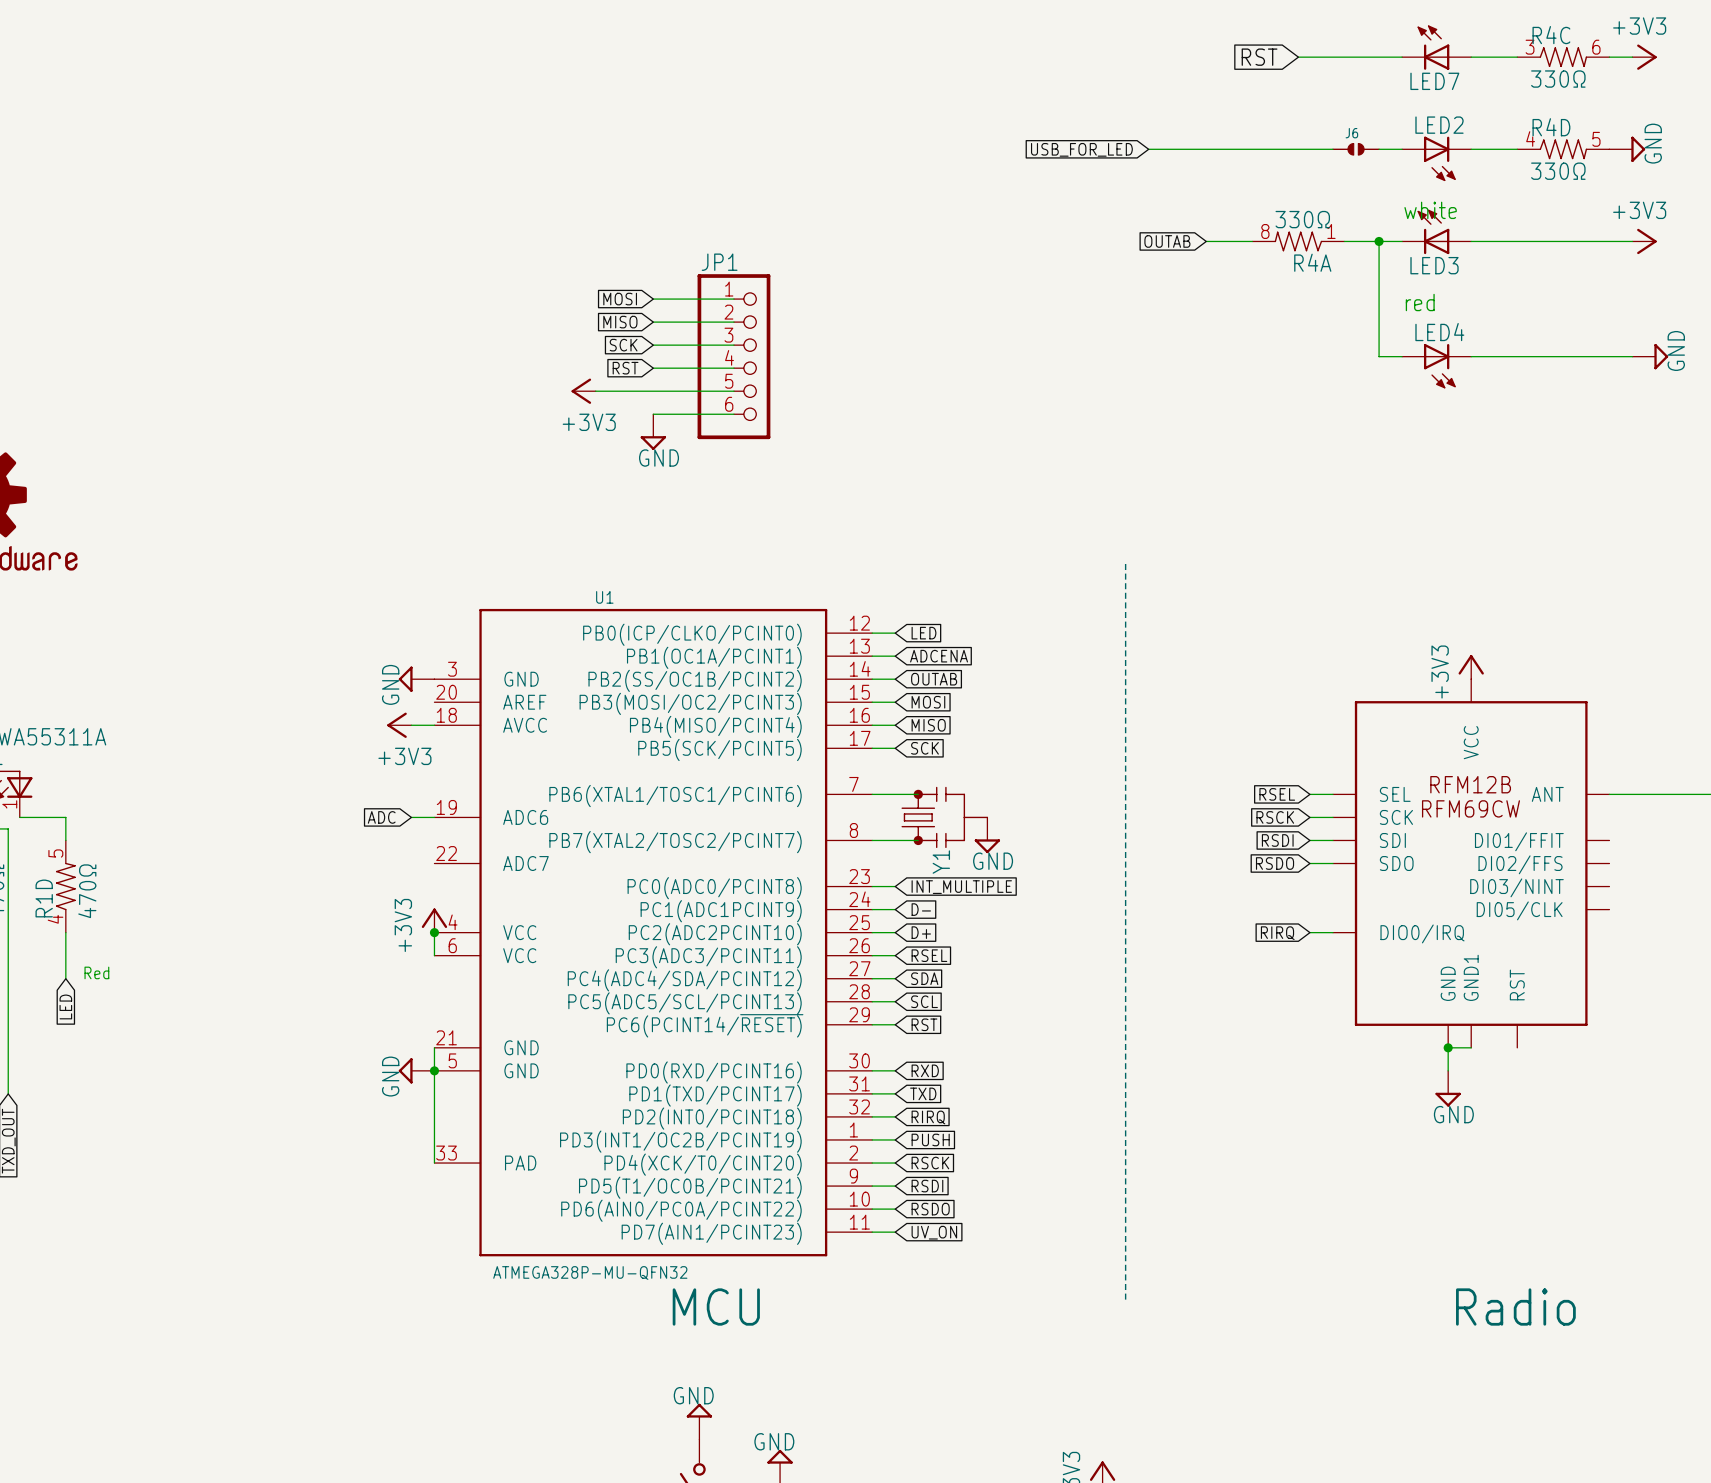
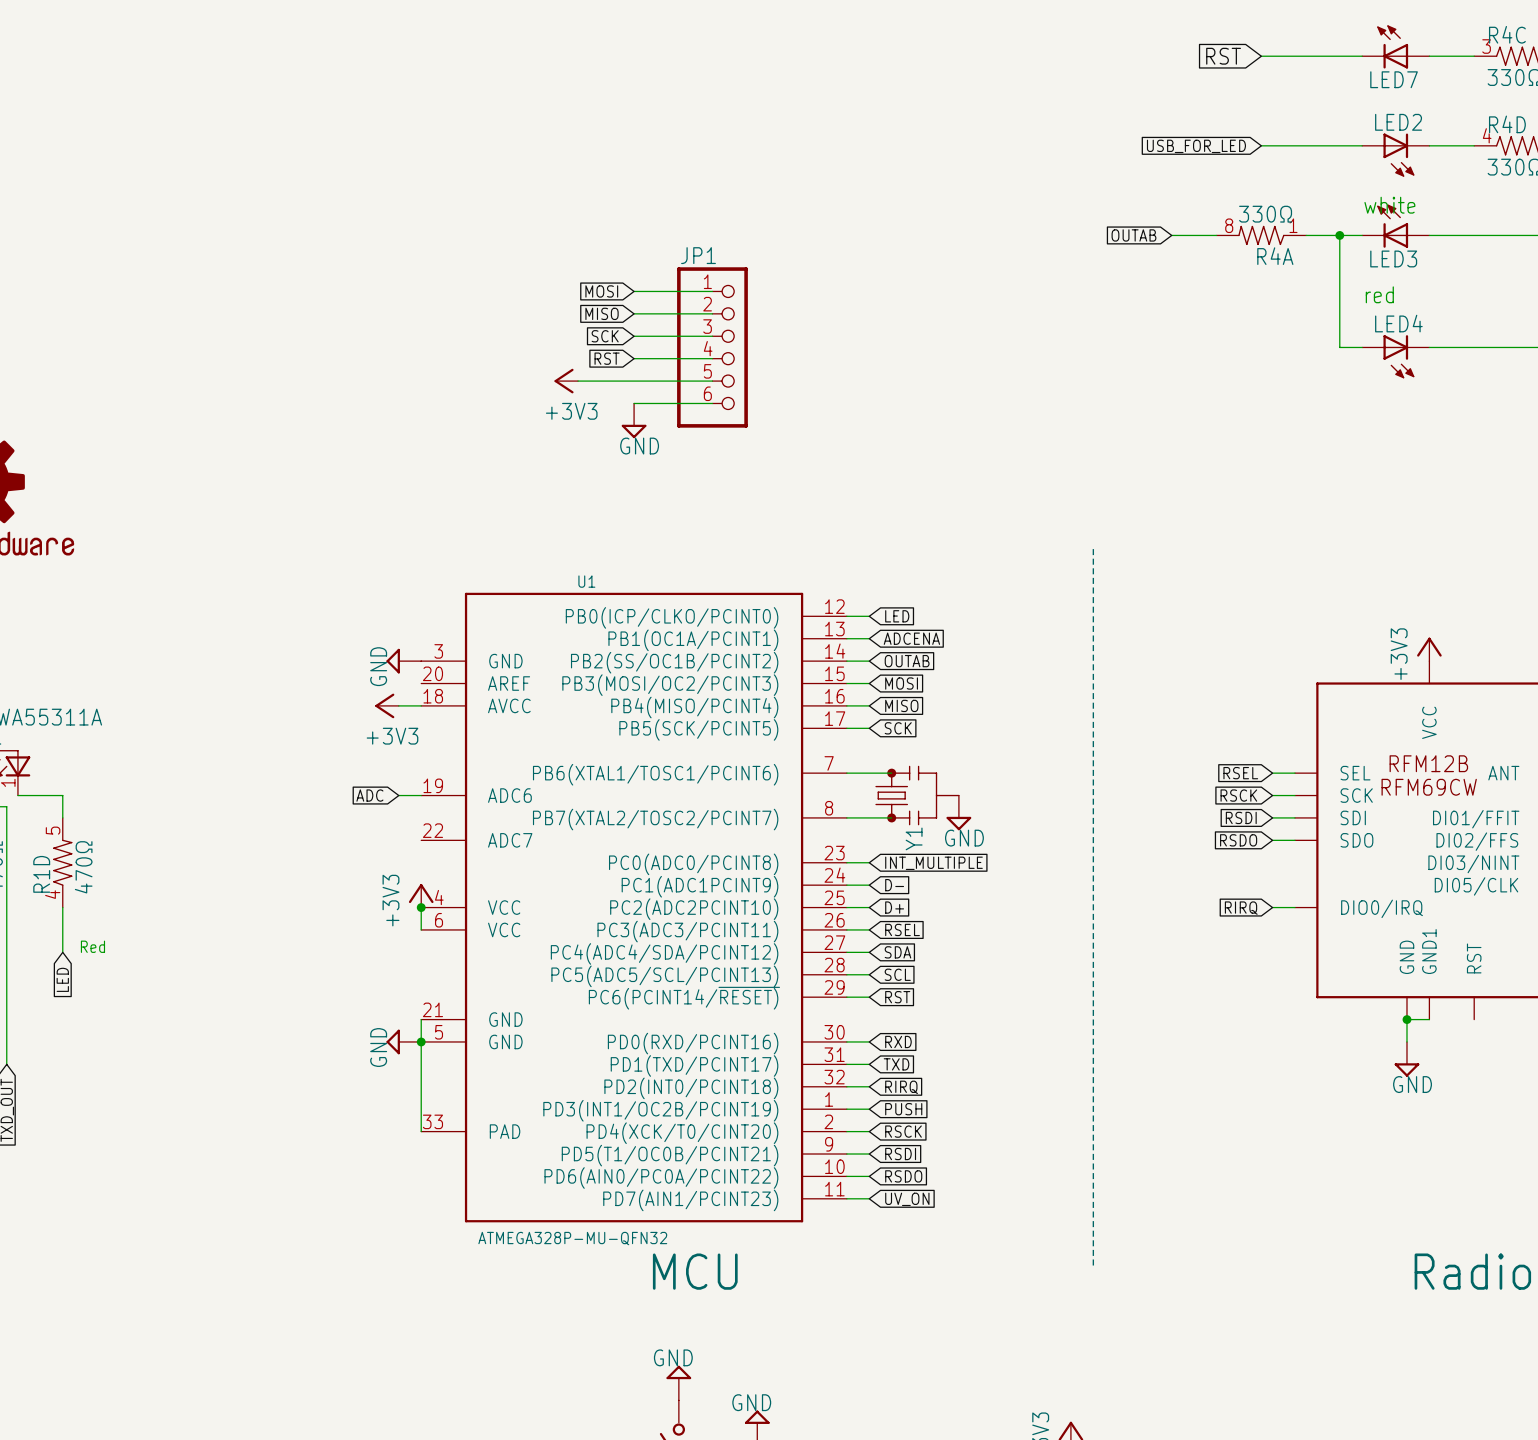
global label position: USB_FOR_LED (1081, 149) -> USB_FOR_LED (1196, 146)
wire: (1148, 149) (1298, 149) -> none
J6: (1356, 149) -> none

